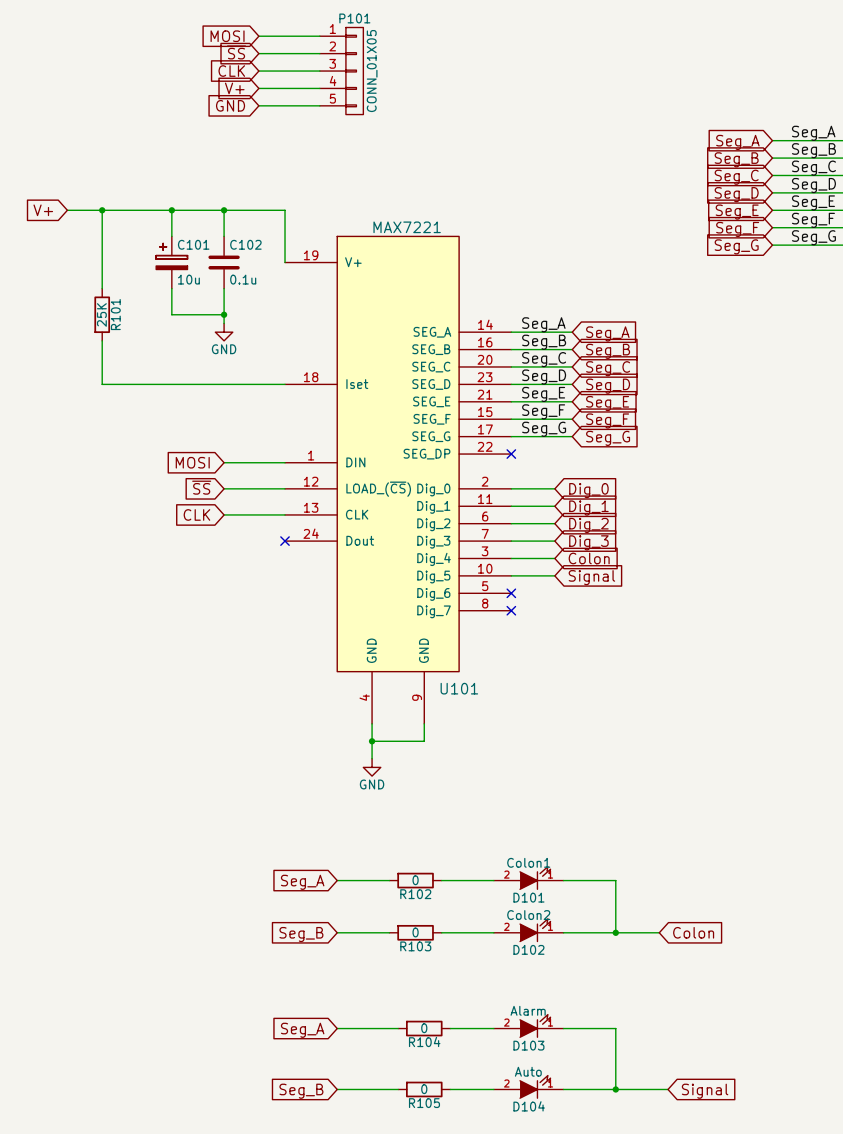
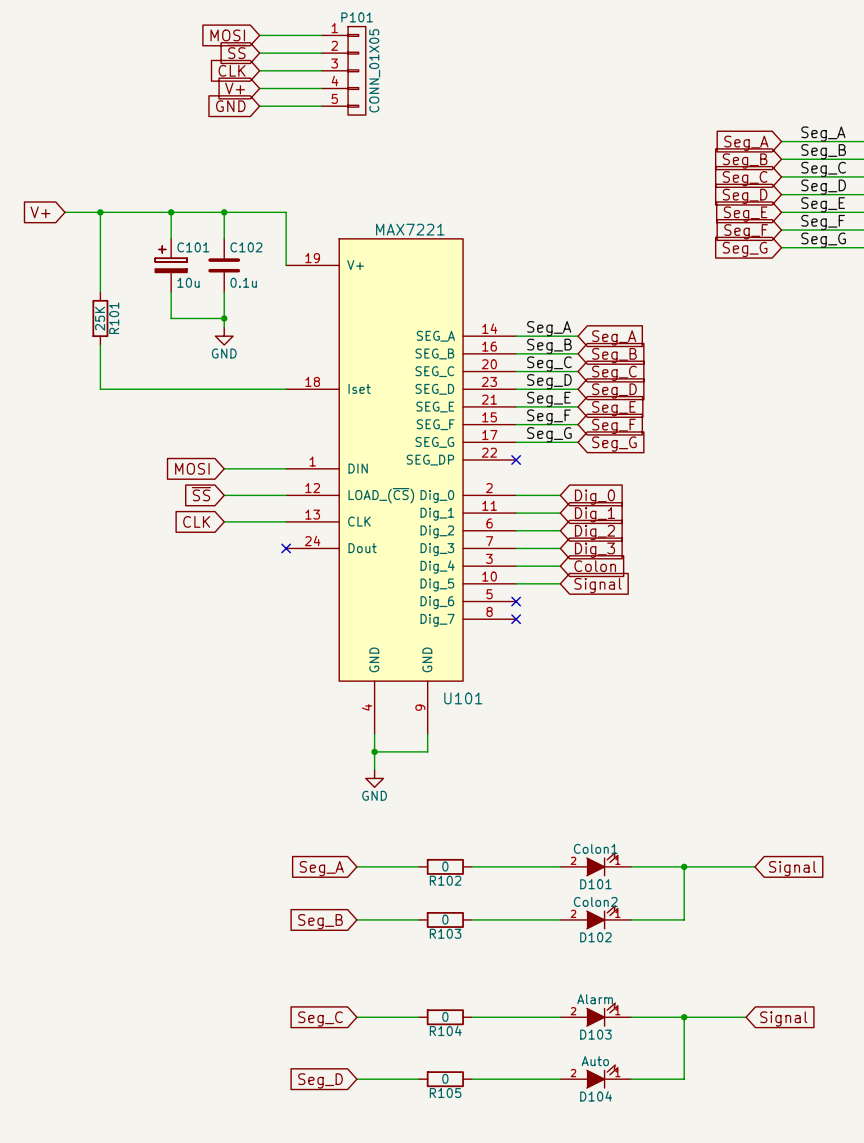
wire: none -> (356, 866) (418, 866)
wire: none -> (471, 866) (560, 866)
wire: none -> (631, 866) (754, 866)
wire: none -> (684, 866) (684, 919) (631, 919)
junction: none -> (684, 866)
global label: none -> Signal (792, 868)
D101 position: (528, 877) -> (595, 864)
wire: (337, 880) (389, 880) -> none
R102 position: (415, 880) -> (445, 866)
wire: (441, 880) (493, 880) -> none
wire: (563, 880) (615, 880) (615, 932) -> none
global label position: Seg_A (302, 882) -> Seg_A (321, 868)
wire: none -> (356, 919) (418, 919)
wire: none -> (471, 919) (560, 919)
D102 position: (528, 930) -> (595, 917)
wire: (337, 932) (389, 932) -> none
R103 position: (415, 932) -> (445, 919)
wire: (441, 932) (493, 932) -> none
wire: (563, 932) (659, 932) -> none
junction: (615, 932) -> none
global label: Colon (693, 932) -> none
global label position: Seg_B (301, 934) -> Seg_B (320, 921)
wire: none -> (471, 1017) (560, 1017)
wire: none -> (631, 1017) (746, 1017)
wire: none -> (684, 1017) (684, 1079) (631, 1079)
junction: none -> (684, 1017)
global label: none -> Seg_C (320, 1019)
D103 position: (528, 1025) -> (595, 1014)
wire: (337, 1028) (398, 1028) -> (356, 1017) (418, 1017)
R104 position: (424, 1028) -> (445, 1017)
wire: (450, 1028) (493, 1028) -> none
wire: (563, 1028) (615, 1028) (615, 1089) -> none
global label: Seg_A (302, 1030) -> none
wire: none -> (471, 1079) (560, 1079)
global label: none -> Seg_D (320, 1080)
D104 position: (528, 1086) -> (595, 1076)
wire: (337, 1089) (398, 1089) -> (356, 1079) (418, 1079)
R105 position: (424, 1089) -> (445, 1079)
wire: (450, 1089) (493, 1089) -> none
wire: (563, 1089) (668, 1089) -> none
junction: (615, 1089) -> none
global label: Seg_B (301, 1091) -> none
global label position: Signal (705, 1091) -> Signal (783, 1019)

